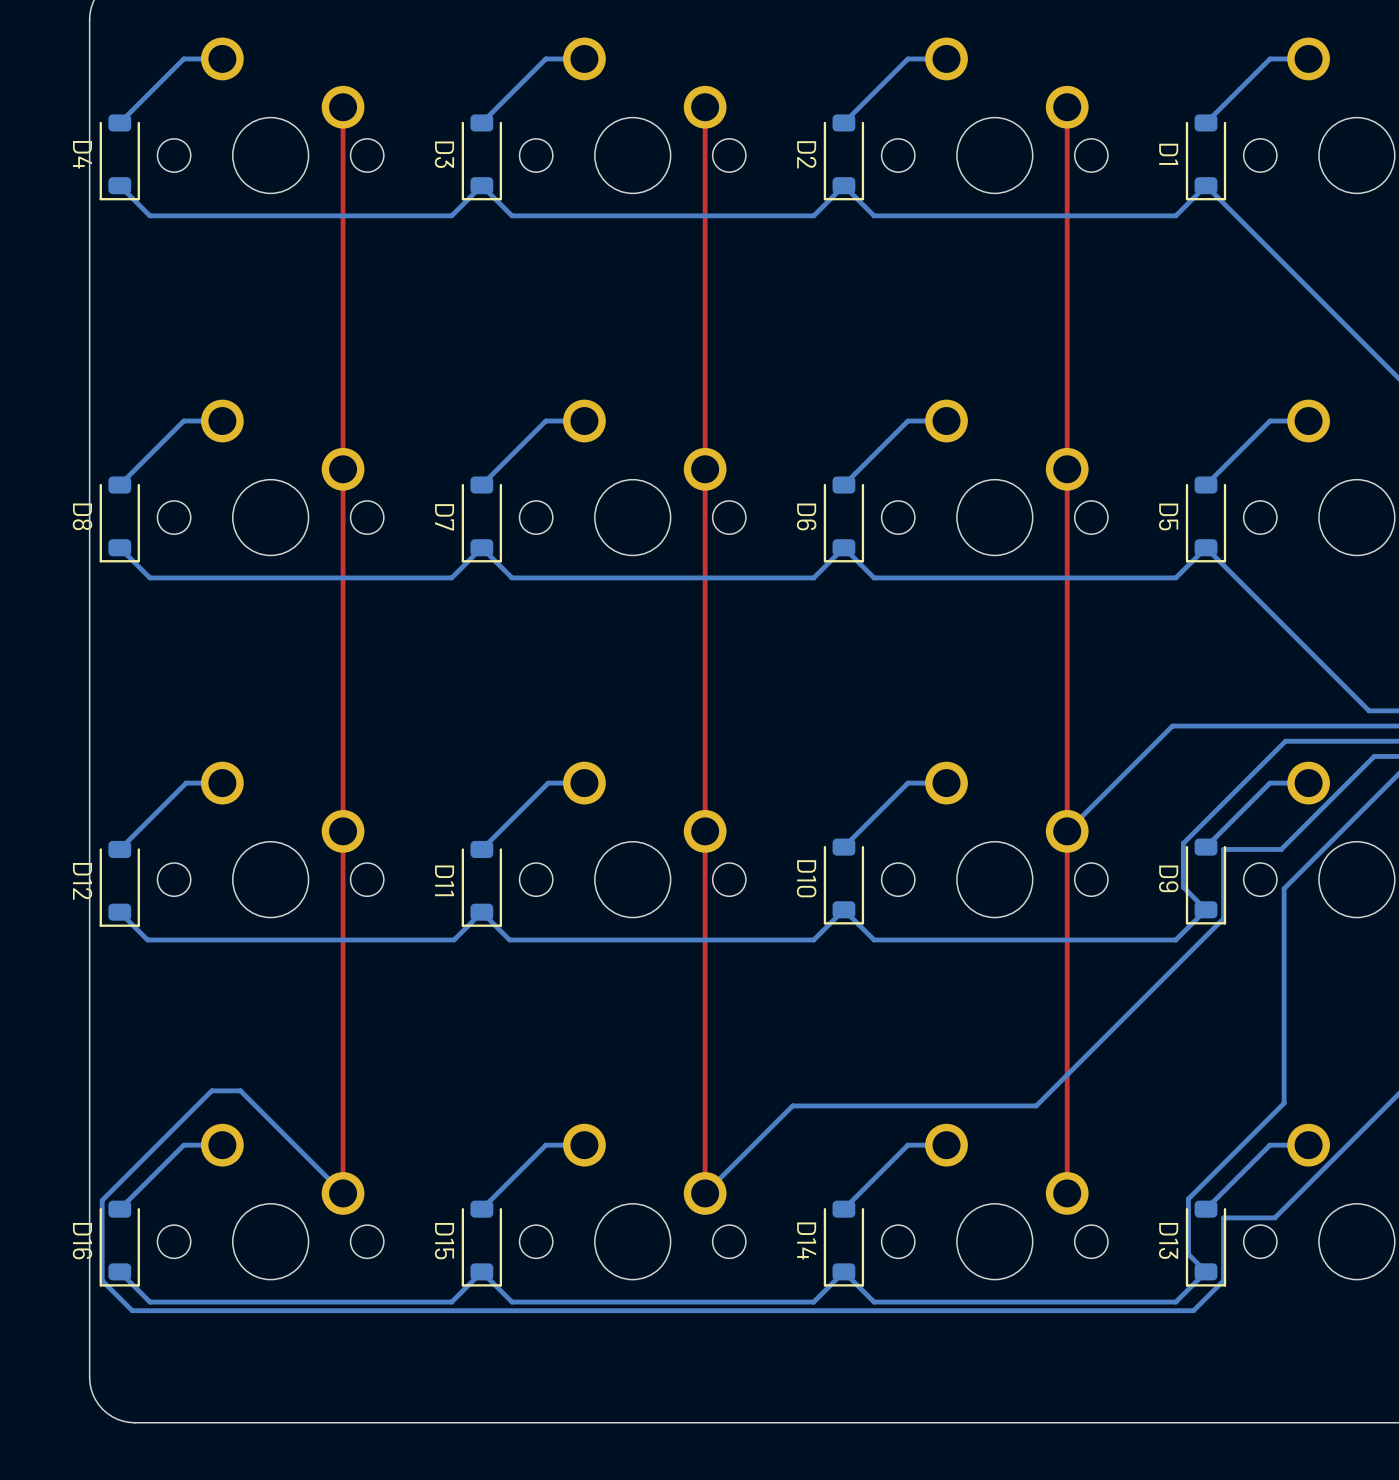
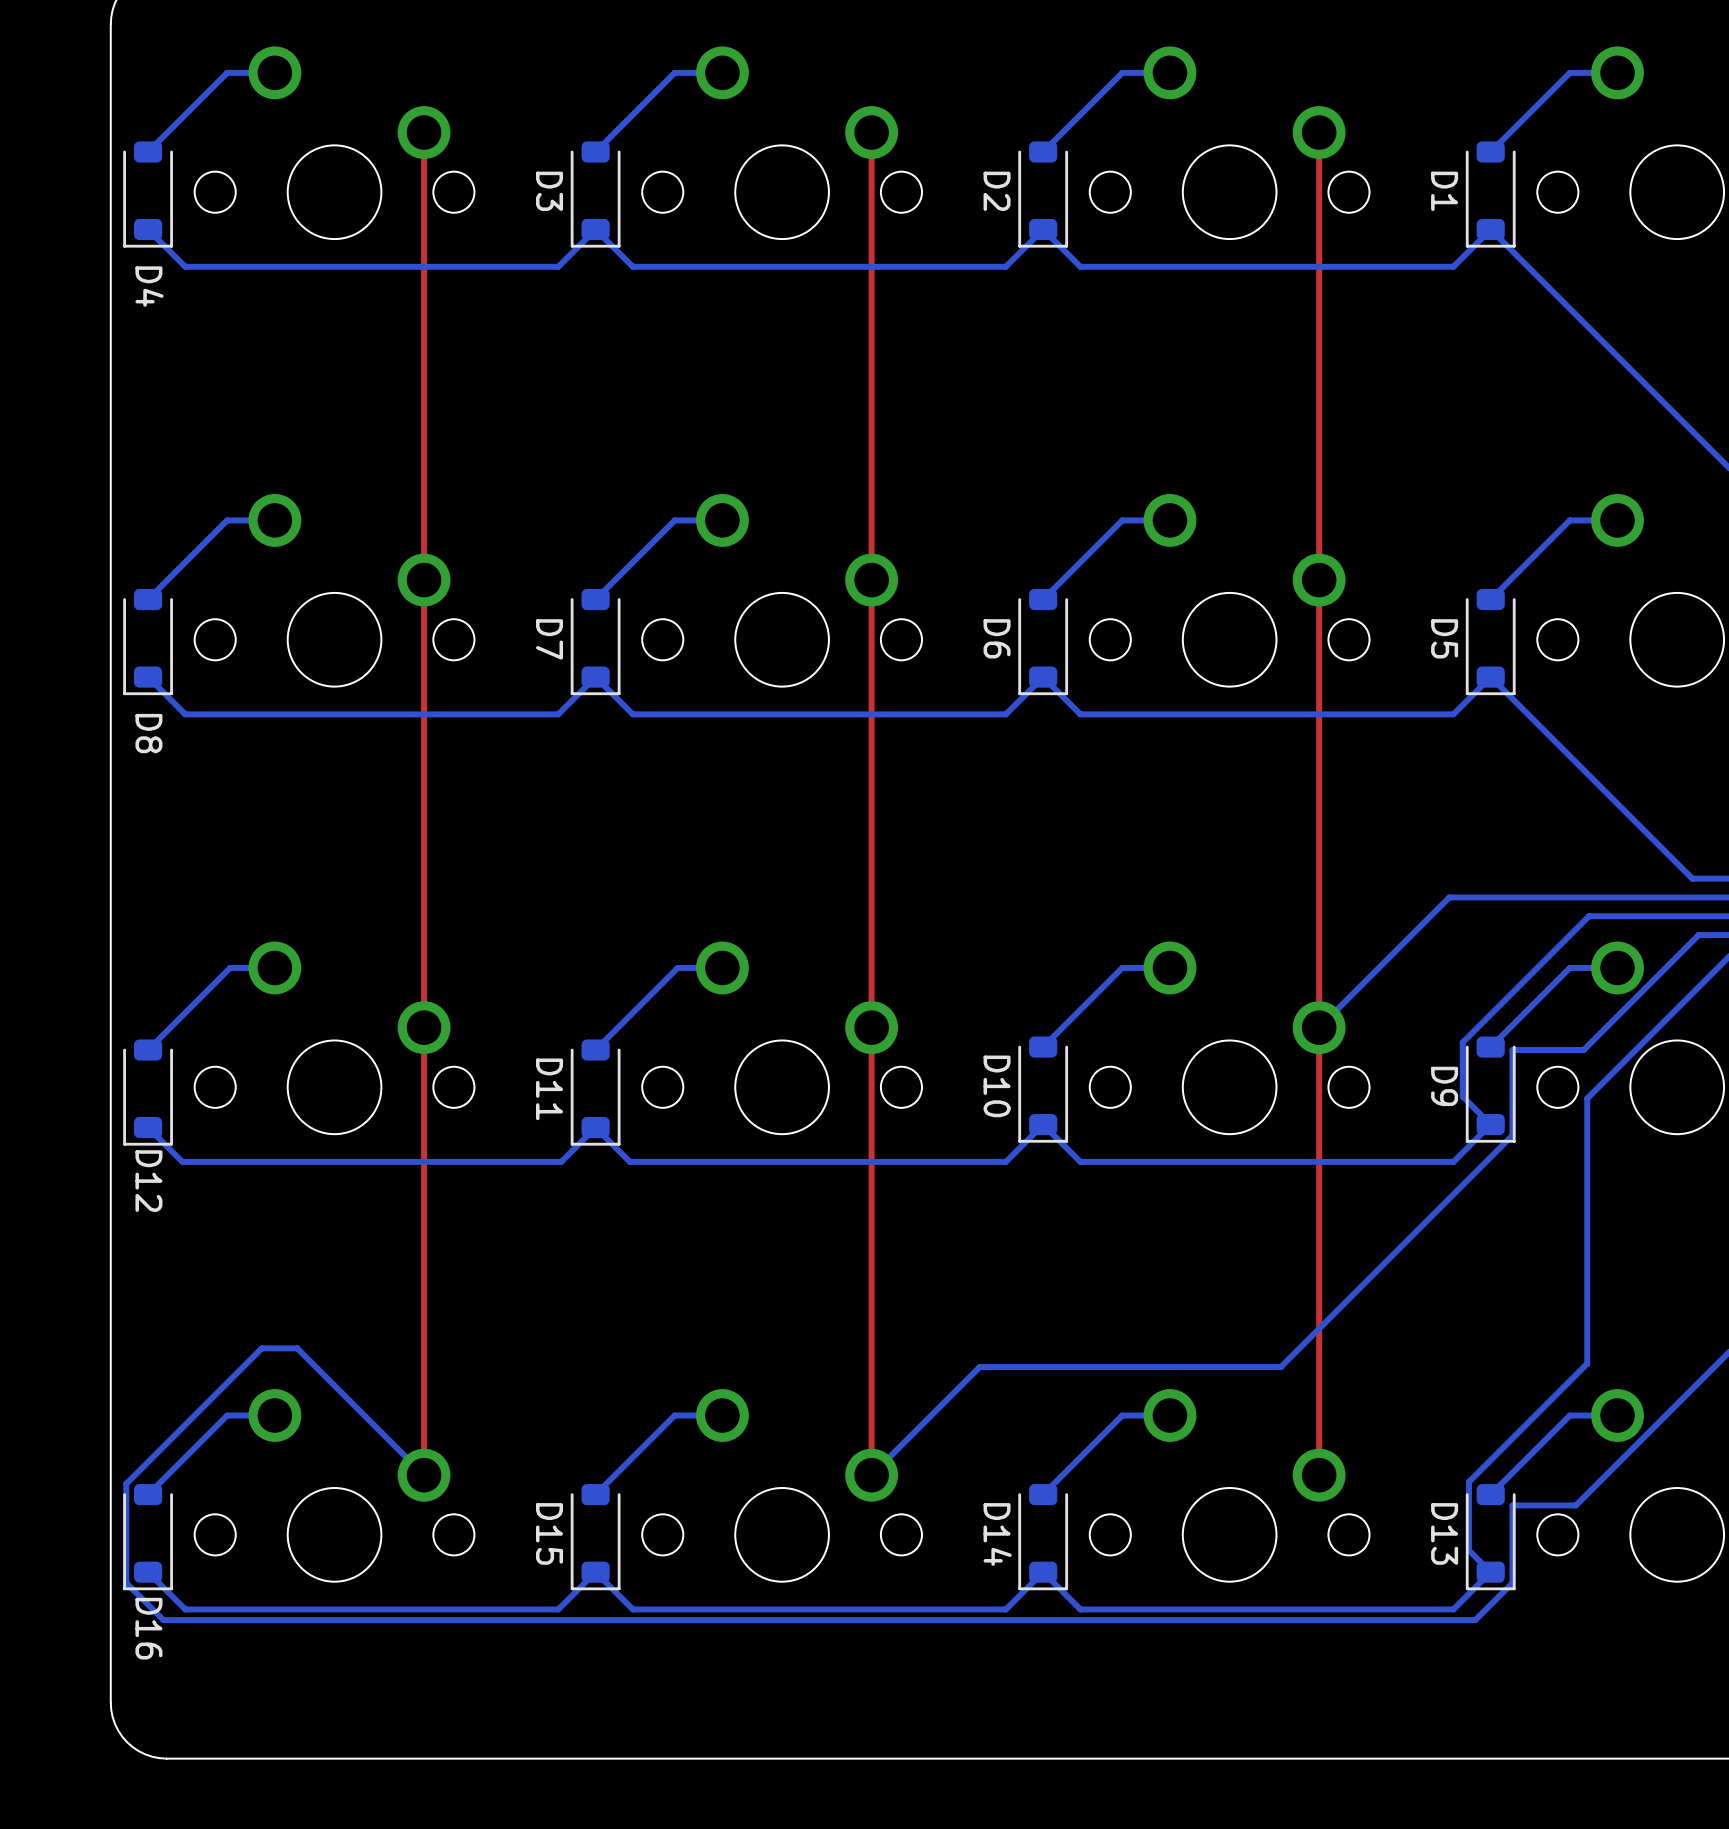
D4 name position: D4 (82, 154) -> D4 (149, 286)
D8 name position: D8 (82, 516) -> D8 (148, 733)
D12 name position: D12 (82, 881) -> D12 (148, 1181)
D16 name position: D16 (82, 1241) -> D16 (148, 1628)

